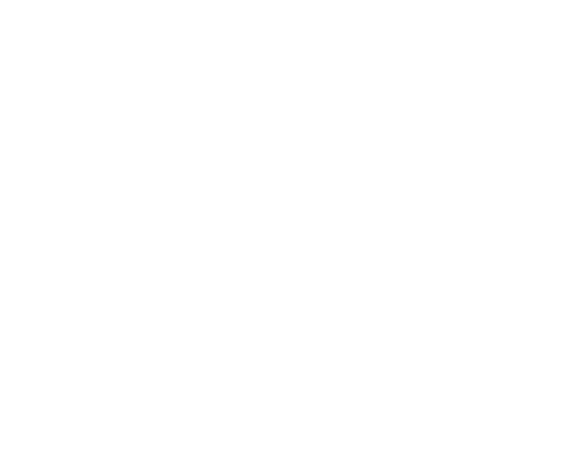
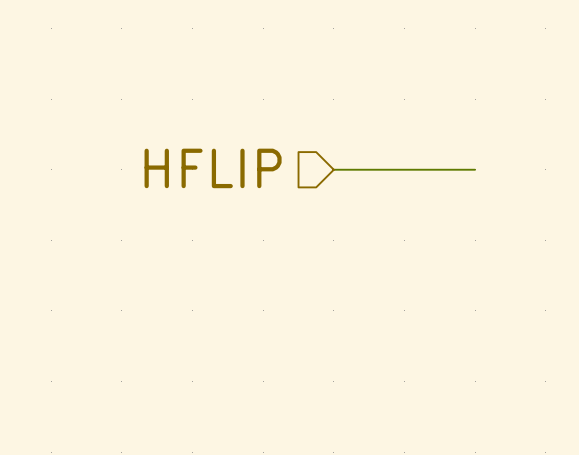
hierarchical label: none -> HFLIP (213, 168)
wire: none -> (333, 169) (475, 169)

